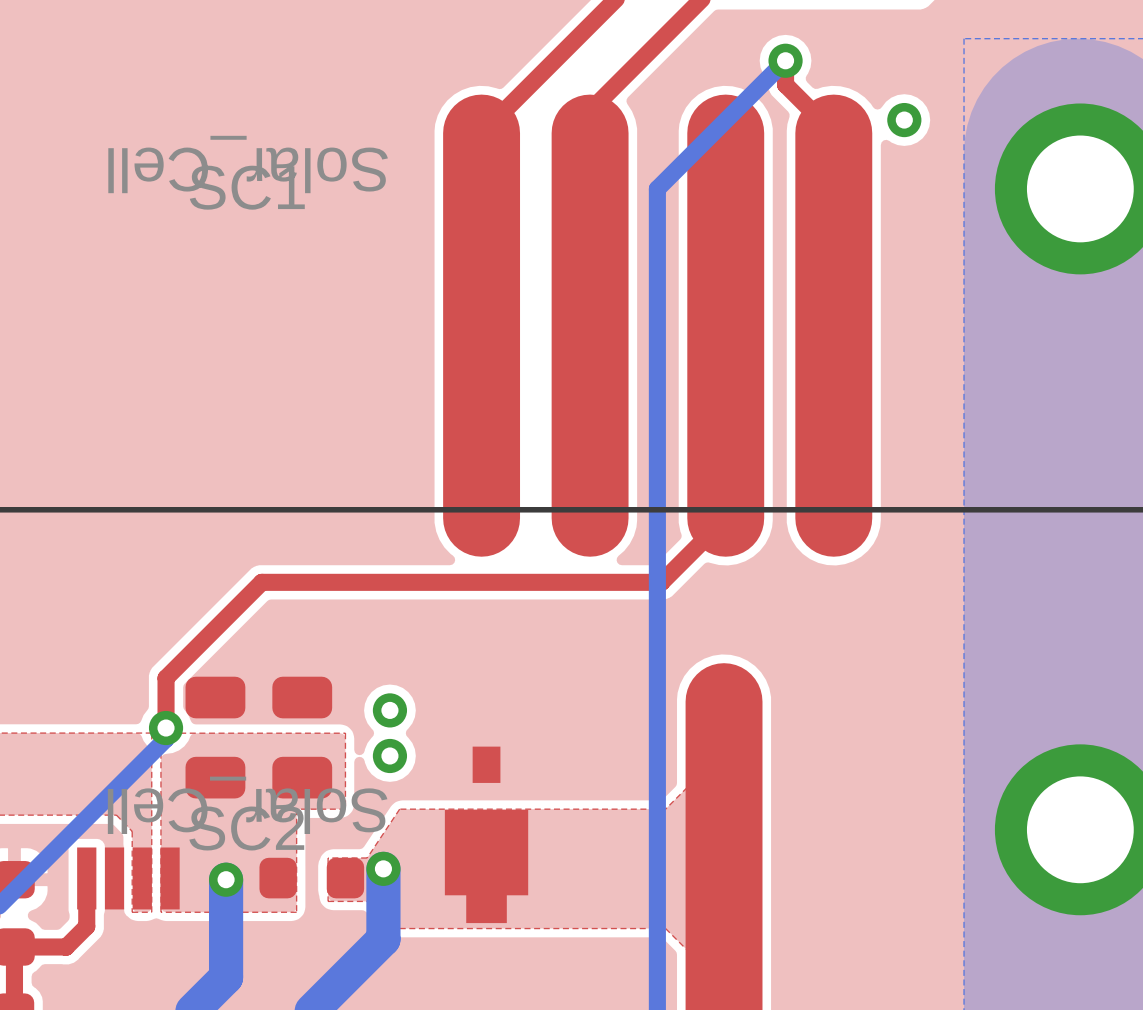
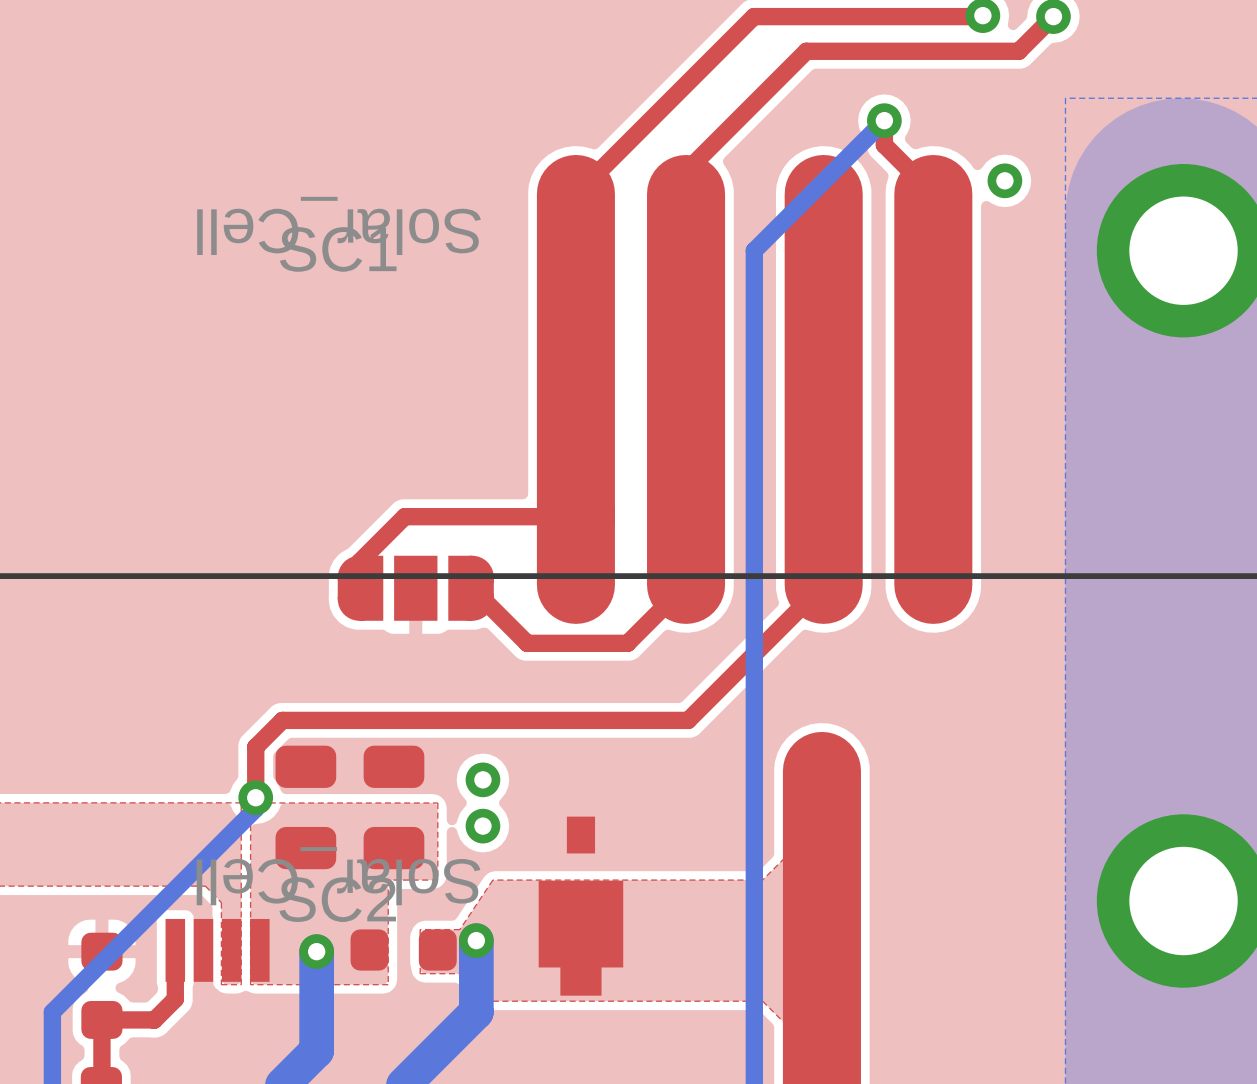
top track: none -> (575, 516) (404, 516) (359, 562) (359, 588)
top track: none -> (686, 584) (627, 643) (527, 643) (472, 588)
part: none -> (415, 588)
top track: (661, 582) (261, 582) (192, 651) -> (758, 649) (688, 720) (282, 720)

